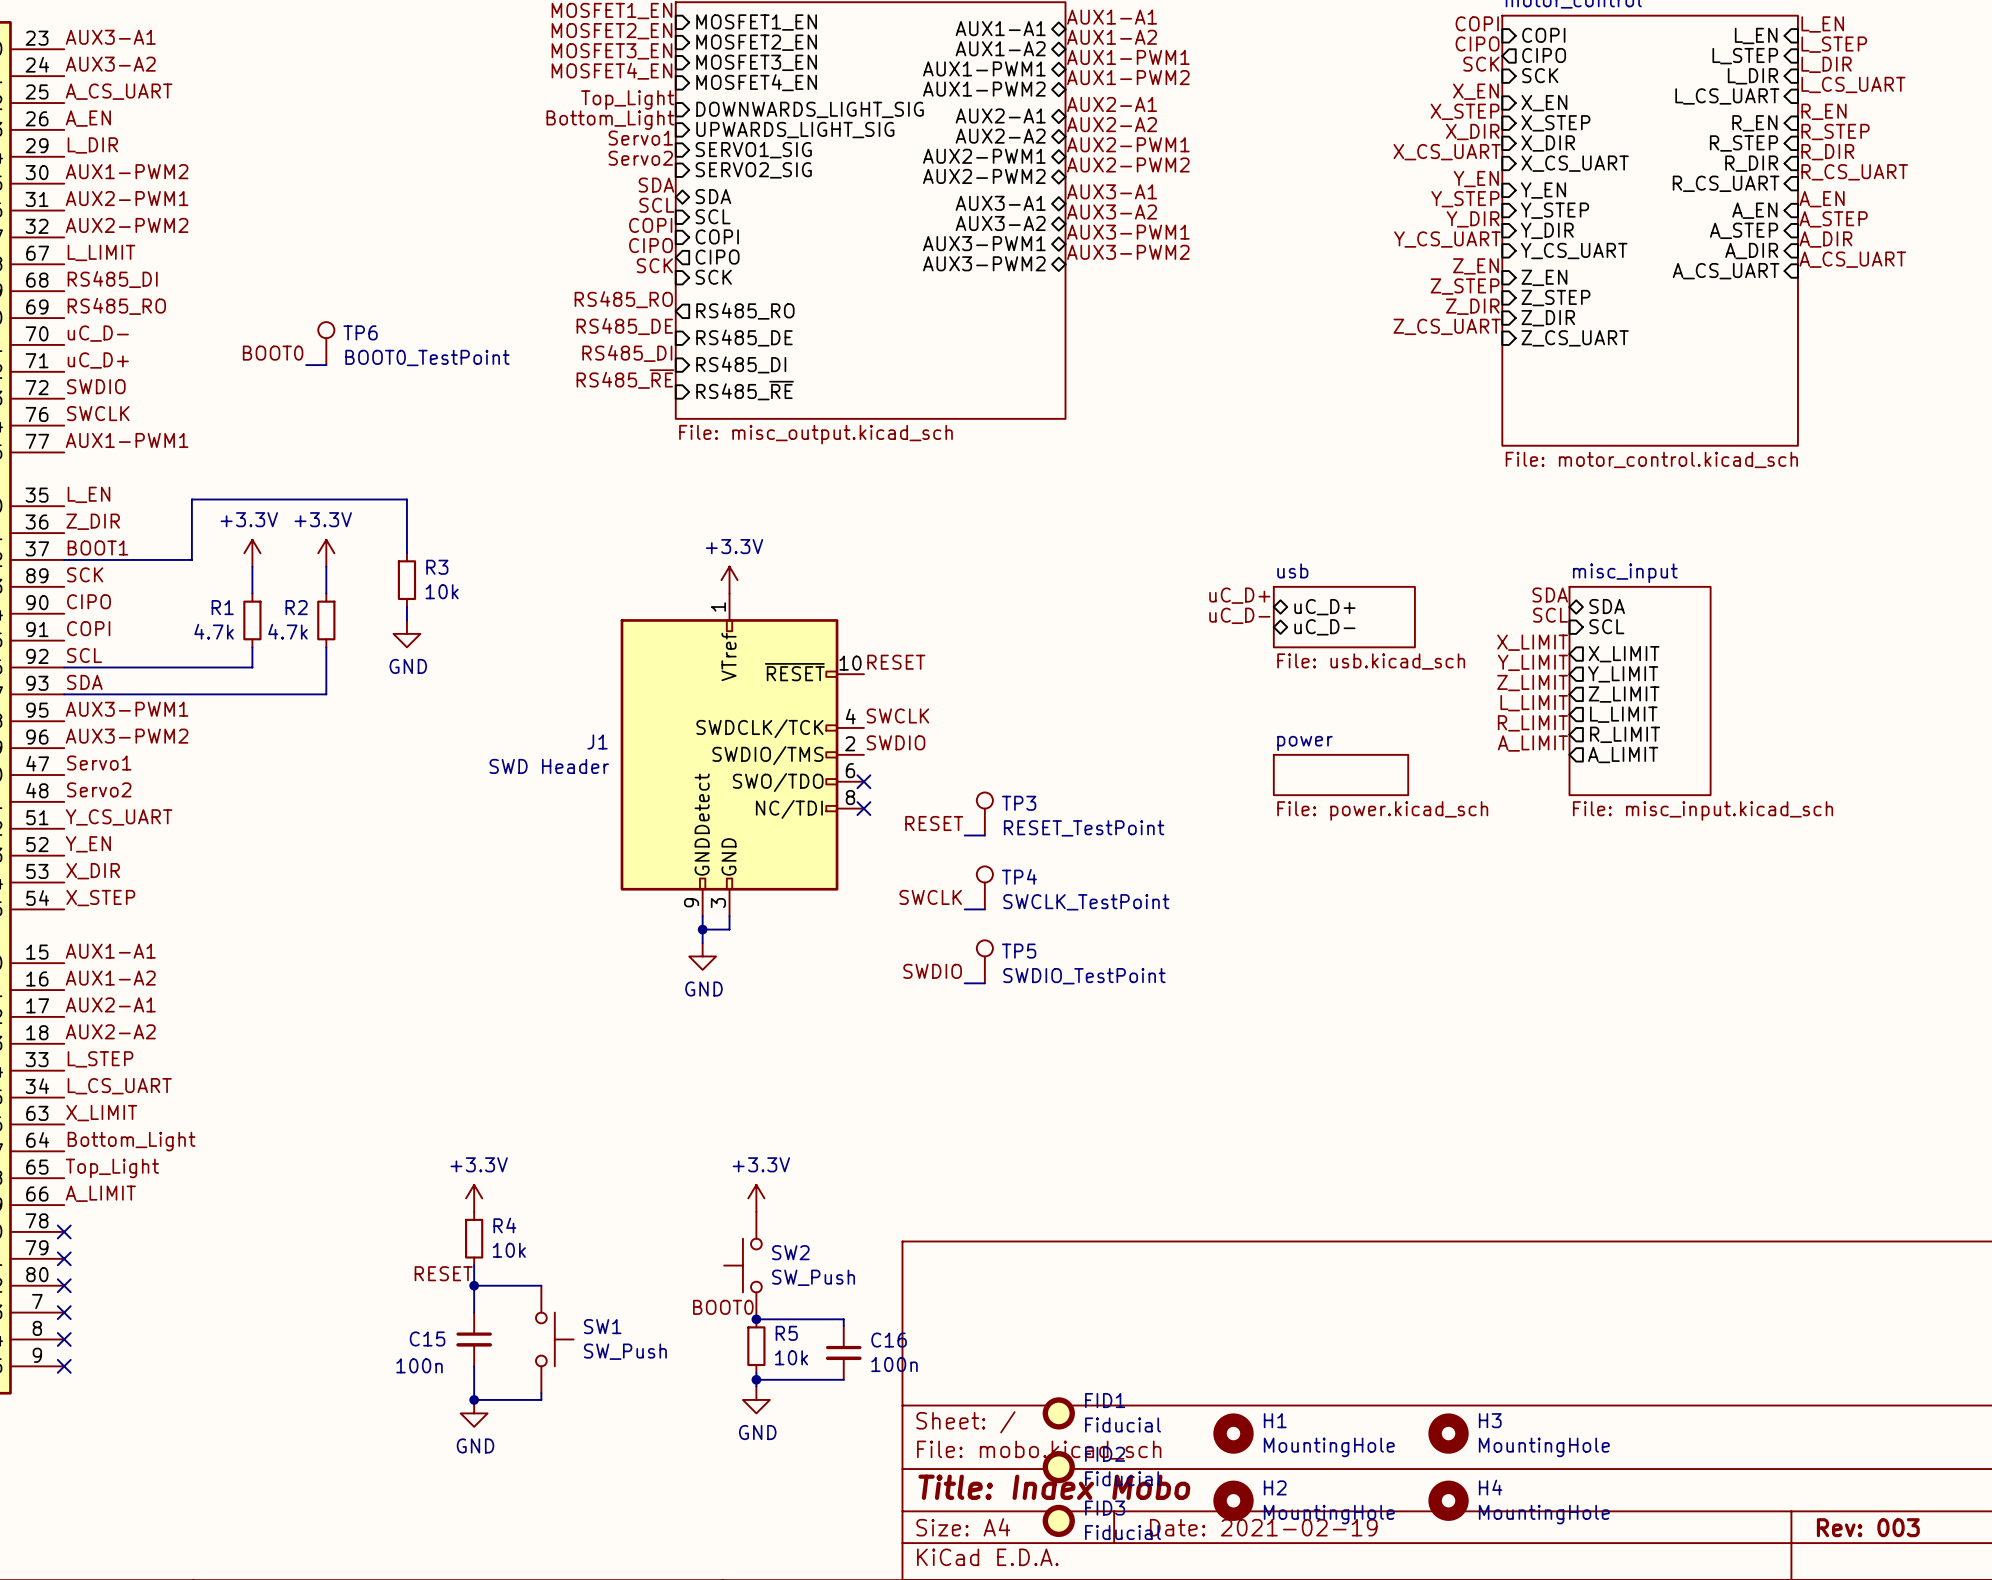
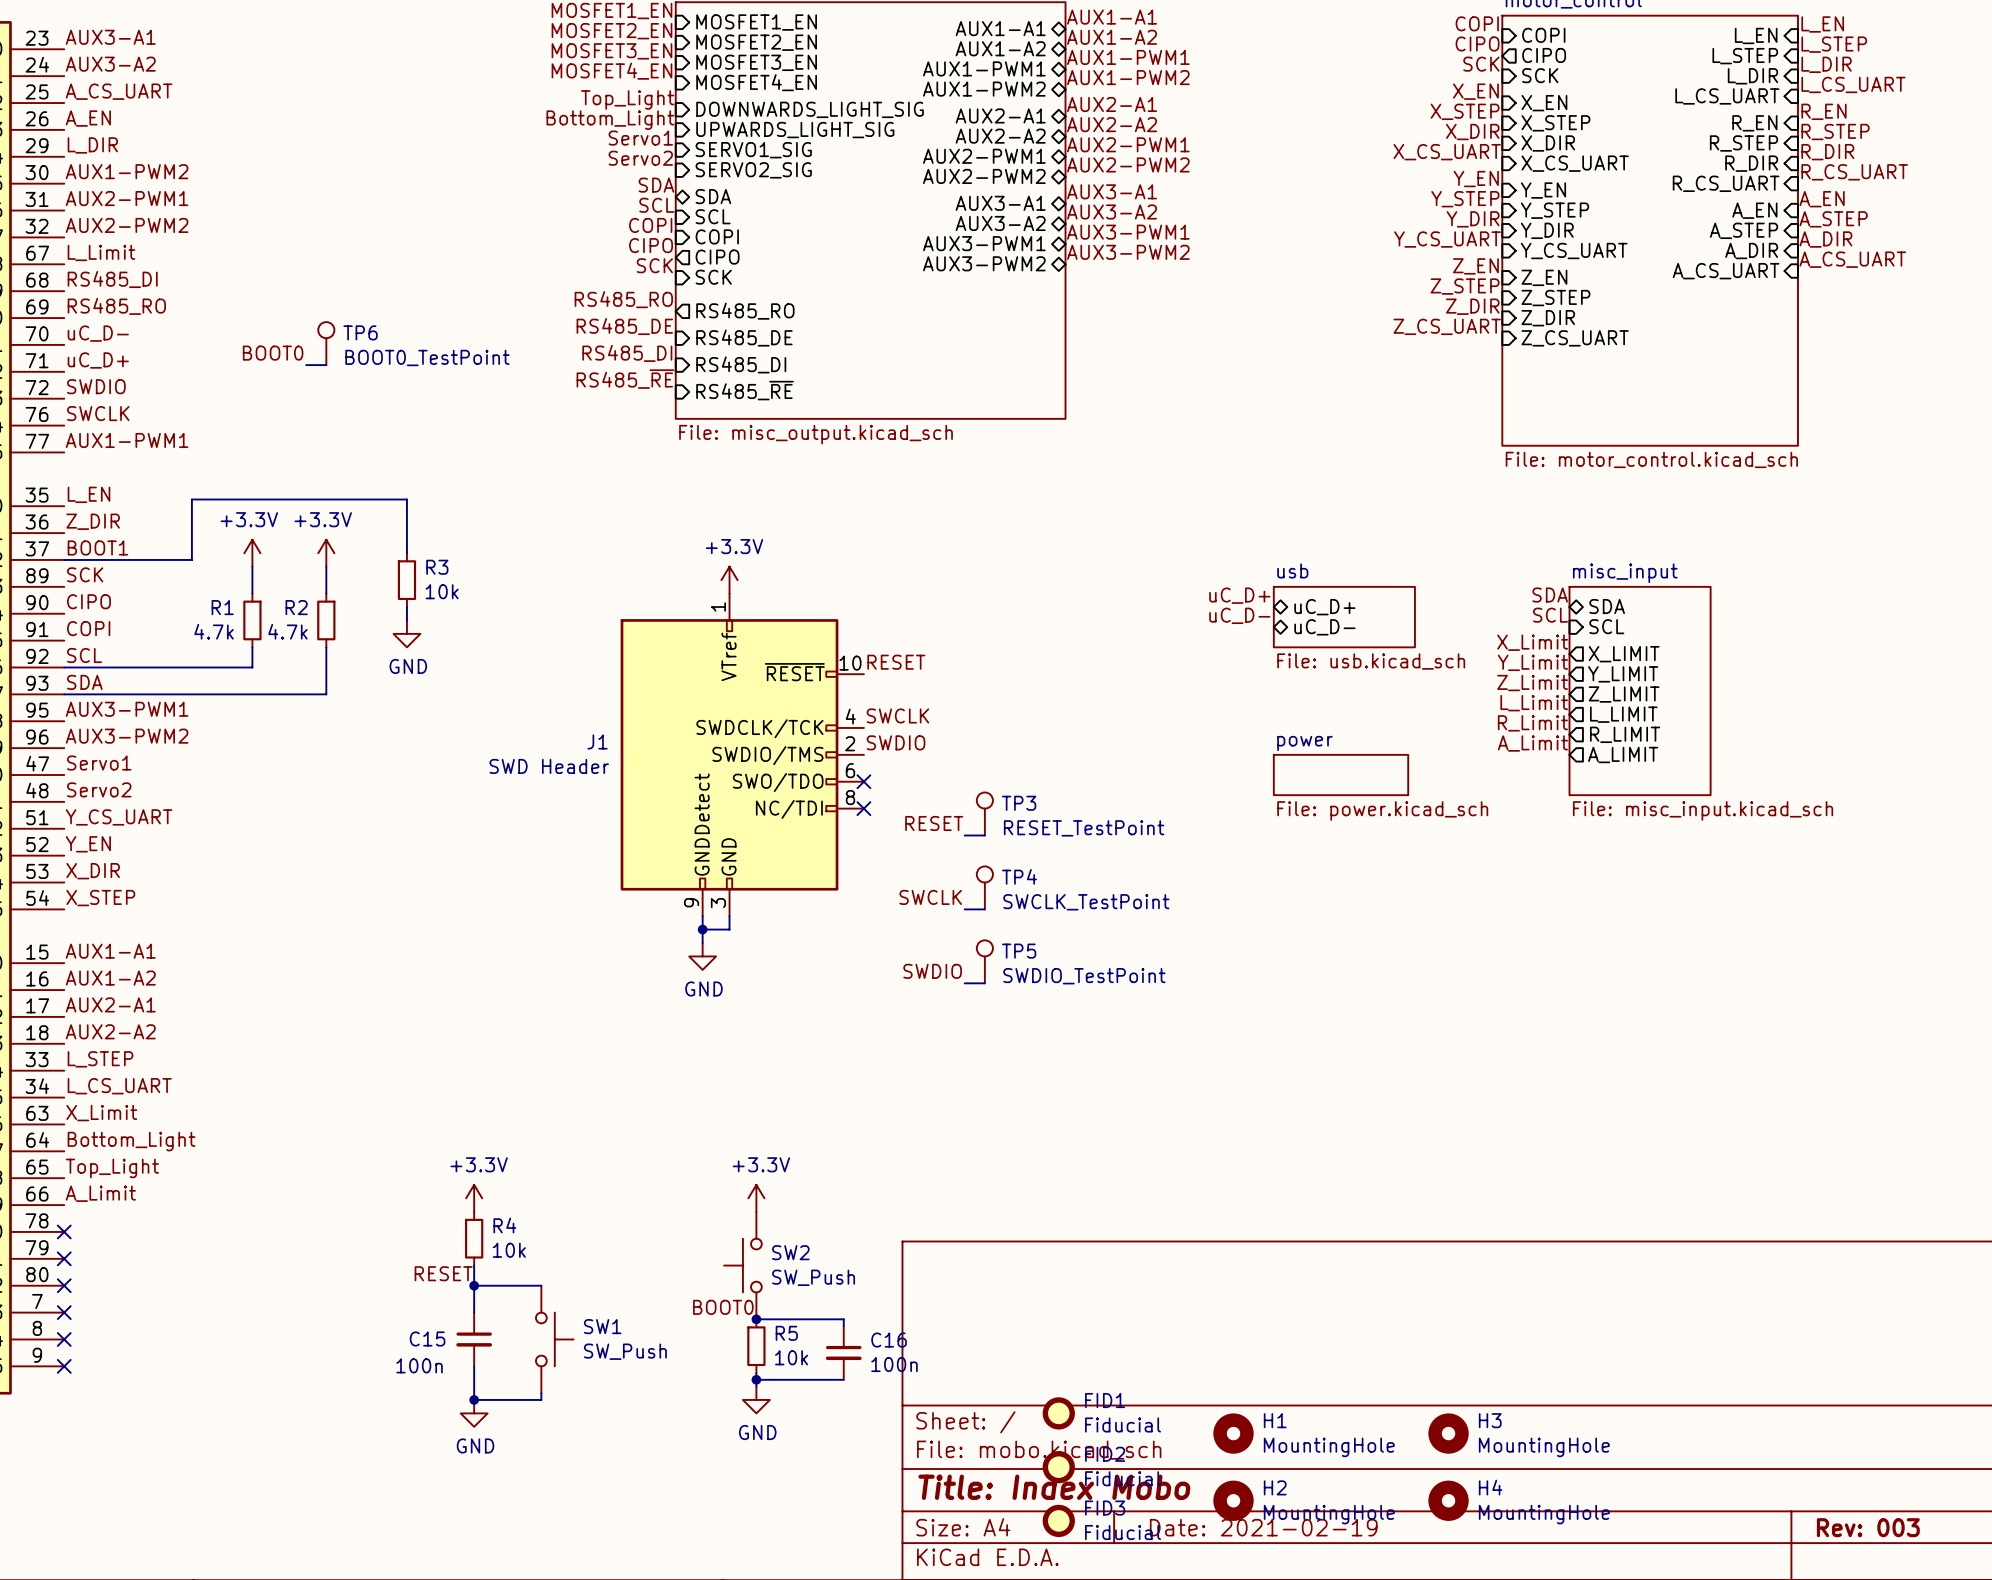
label: L_LIMIT (101, 252) -> L_Limit (101, 252)
label: X_LIMIT (1532, 642) -> X_Limit (1532, 642)
label: Y_LIMIT (1532, 662) -> Y_Limit (1532, 662)
label: Z_LIMIT (1532, 683) -> Z_Limit (1532, 683)
label: L_LIMIT (1534, 703) -> L_Limit (1534, 703)
label: R_LIMIT (1532, 723) -> R_Limit (1532, 723)
label: A_LIMIT (1532, 743) -> A_Limit (1532, 743)
label: X_LIMIT (101, 1113) -> X_Limit (101, 1113)
label: A_LIMIT (100, 1193) -> A_Limit (100, 1193)

